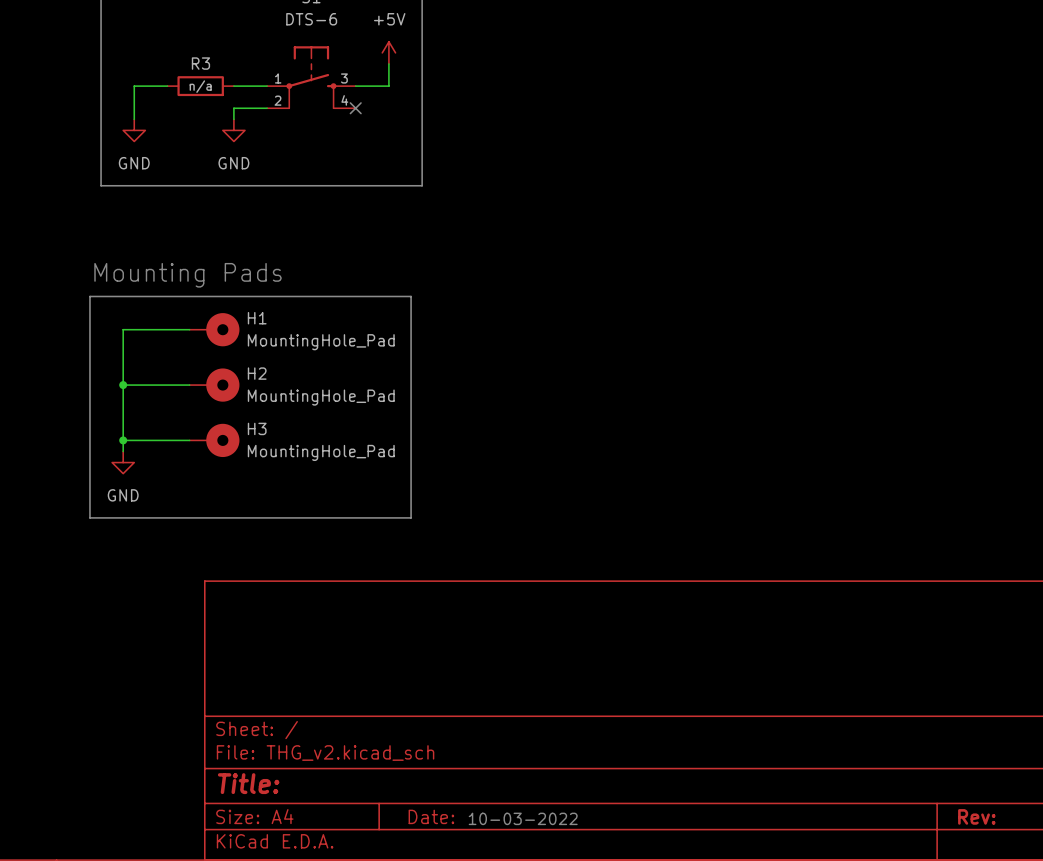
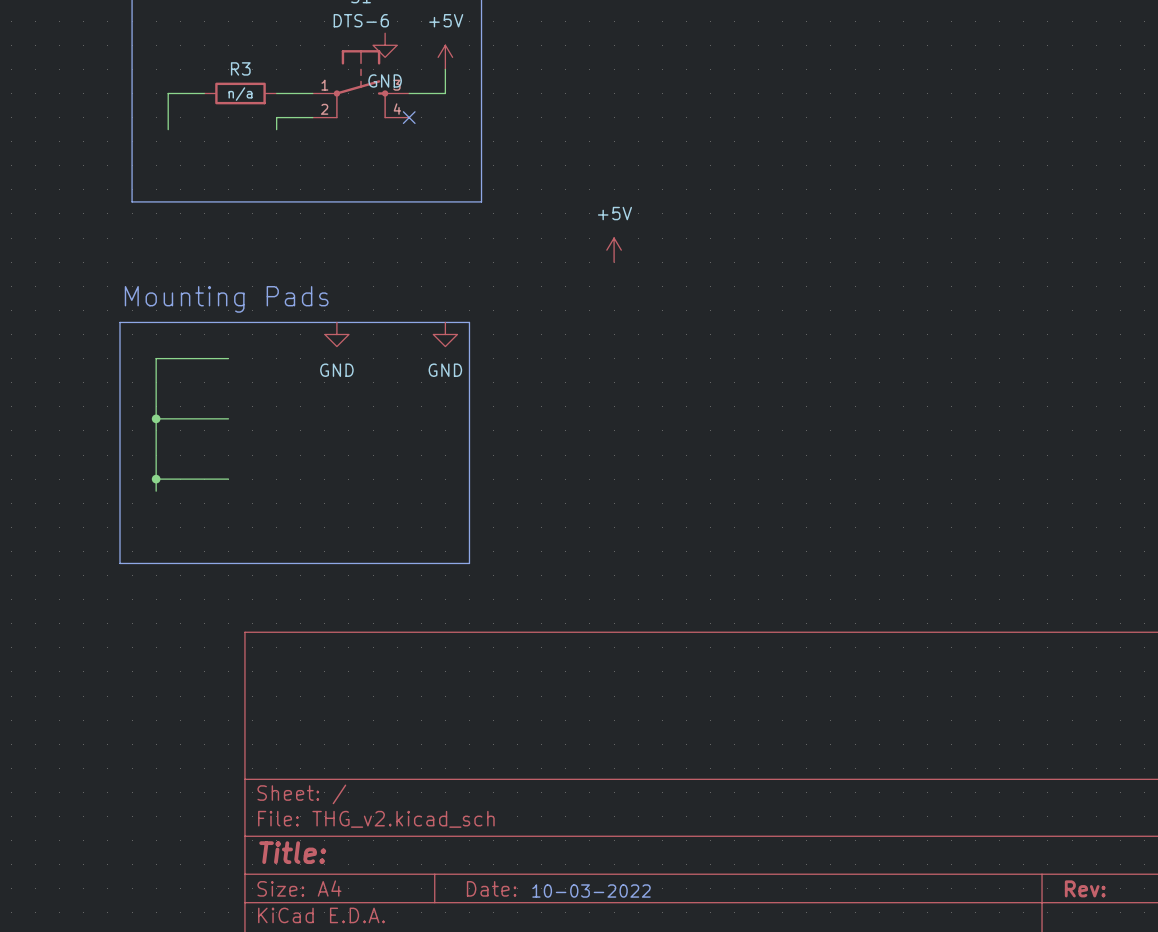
power symbol: none -> GND (385, 45)
power symbol: GND (134, 130) -> none
power symbol: GND (233, 130) -> none
power symbol: none -> +5V (614, 250)
power symbol: none -> GND (336, 334)
power symbol: none -> GND (445, 334)
H1: MountingHole_Pad (214, 329) -> none
H2: MountingHole_Pad (214, 385) -> none
H3: MountingHole_Pad (214, 440) -> none
power symbol: GND (123, 462) -> none

